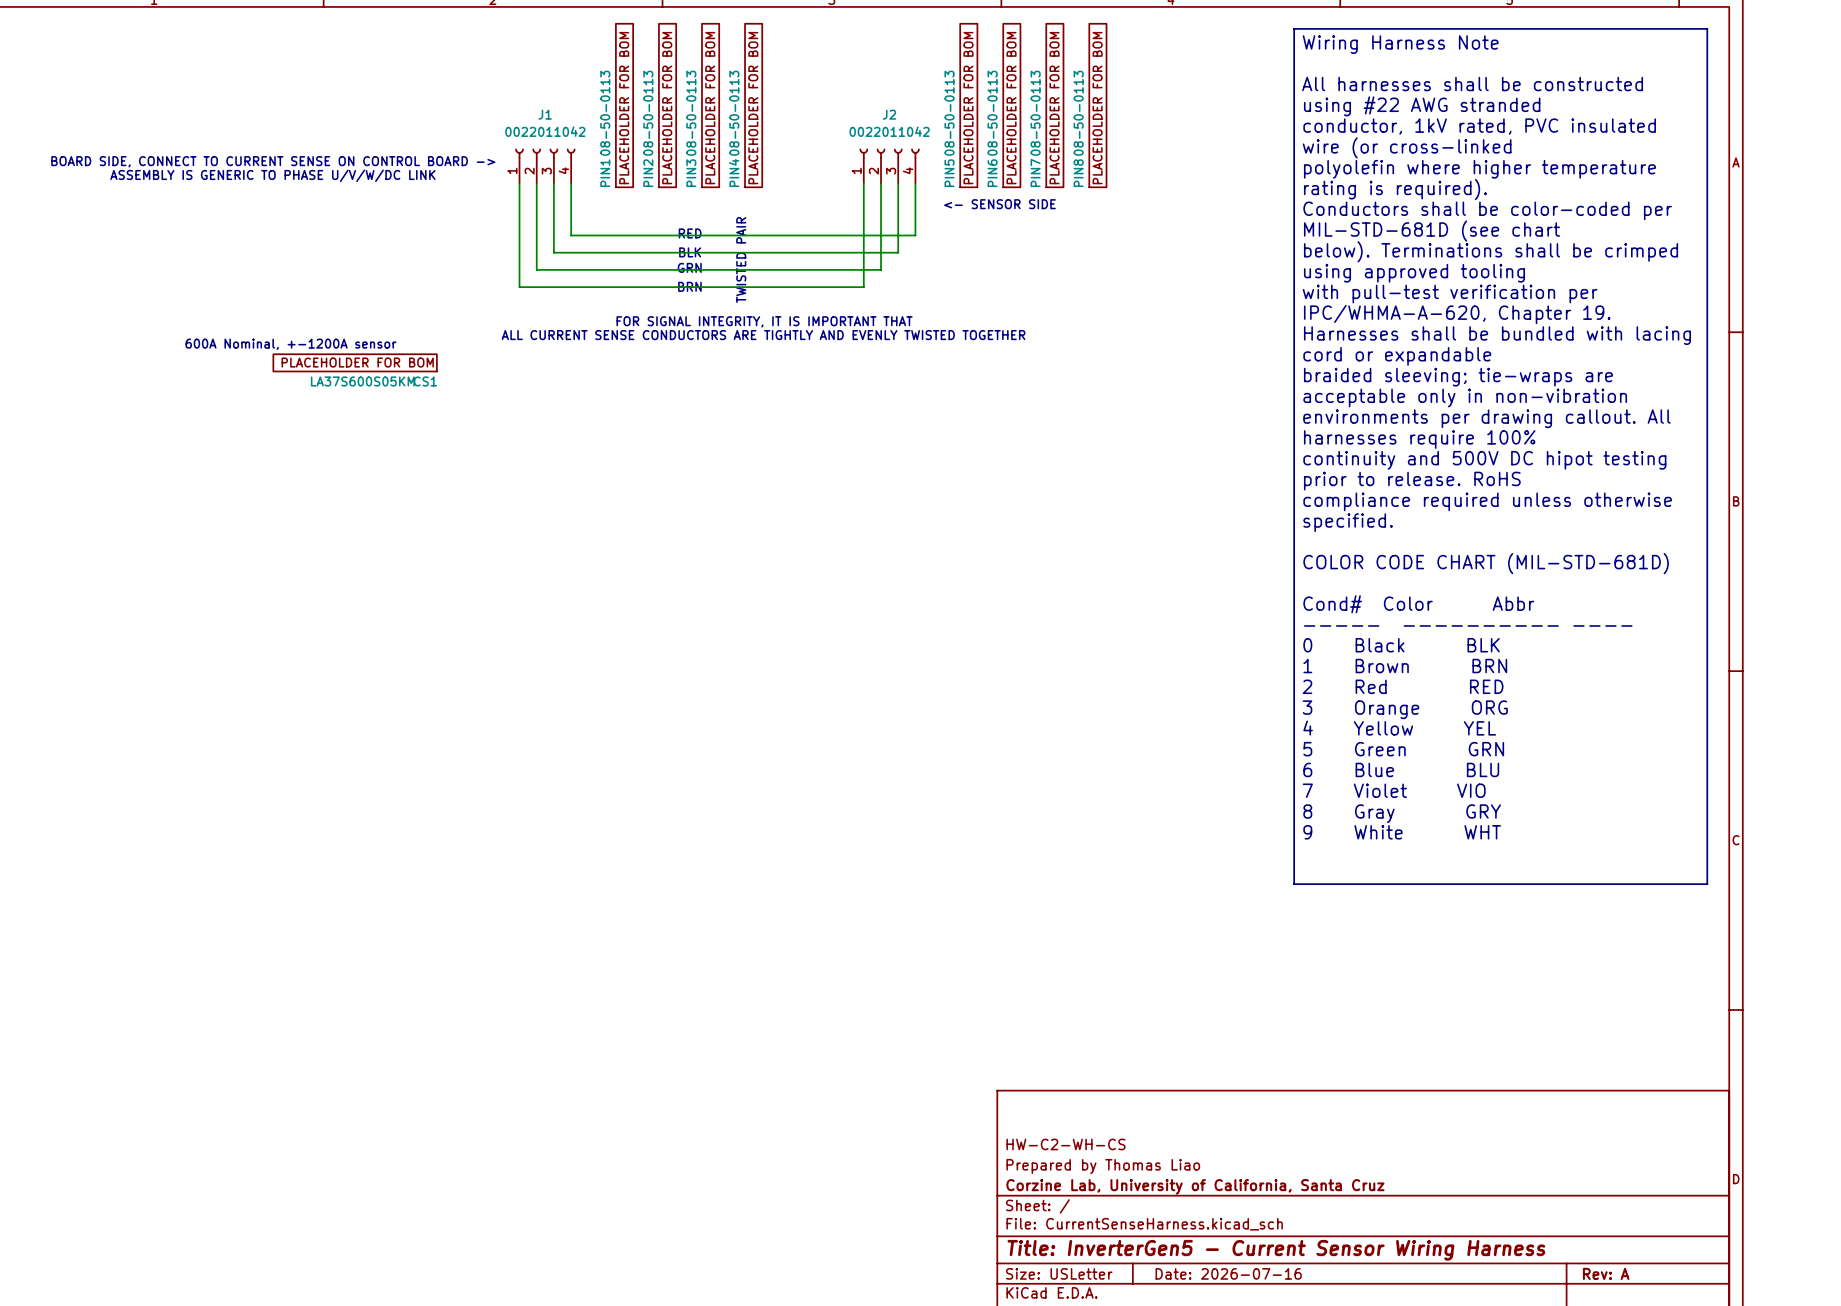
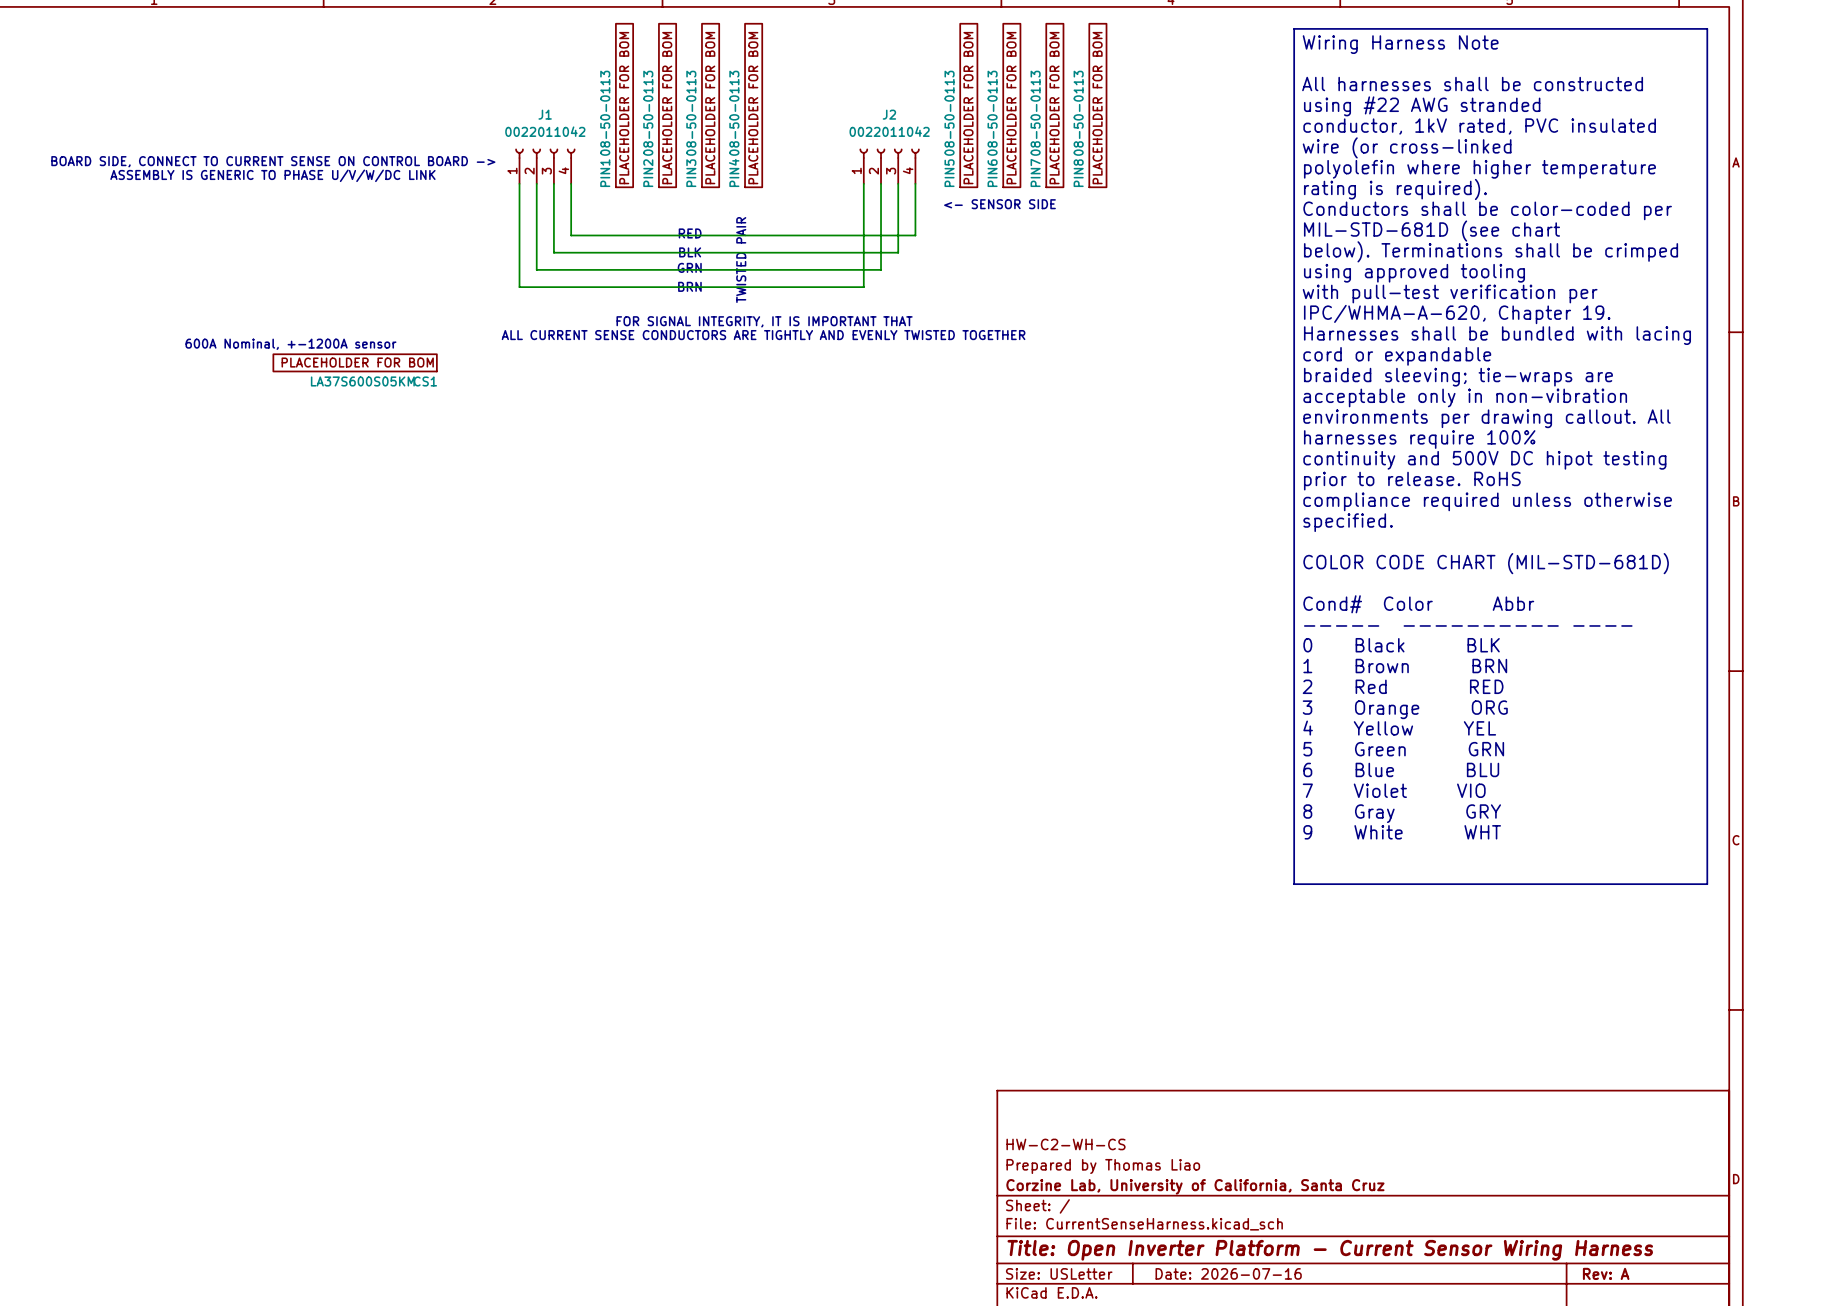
title block: Title: InverterGen5 - Current Sensor Wiring Harness (1276, 1250) -> Title: Open Inverter Platform - Current Sensor Wiring Harness (1330, 1250)

